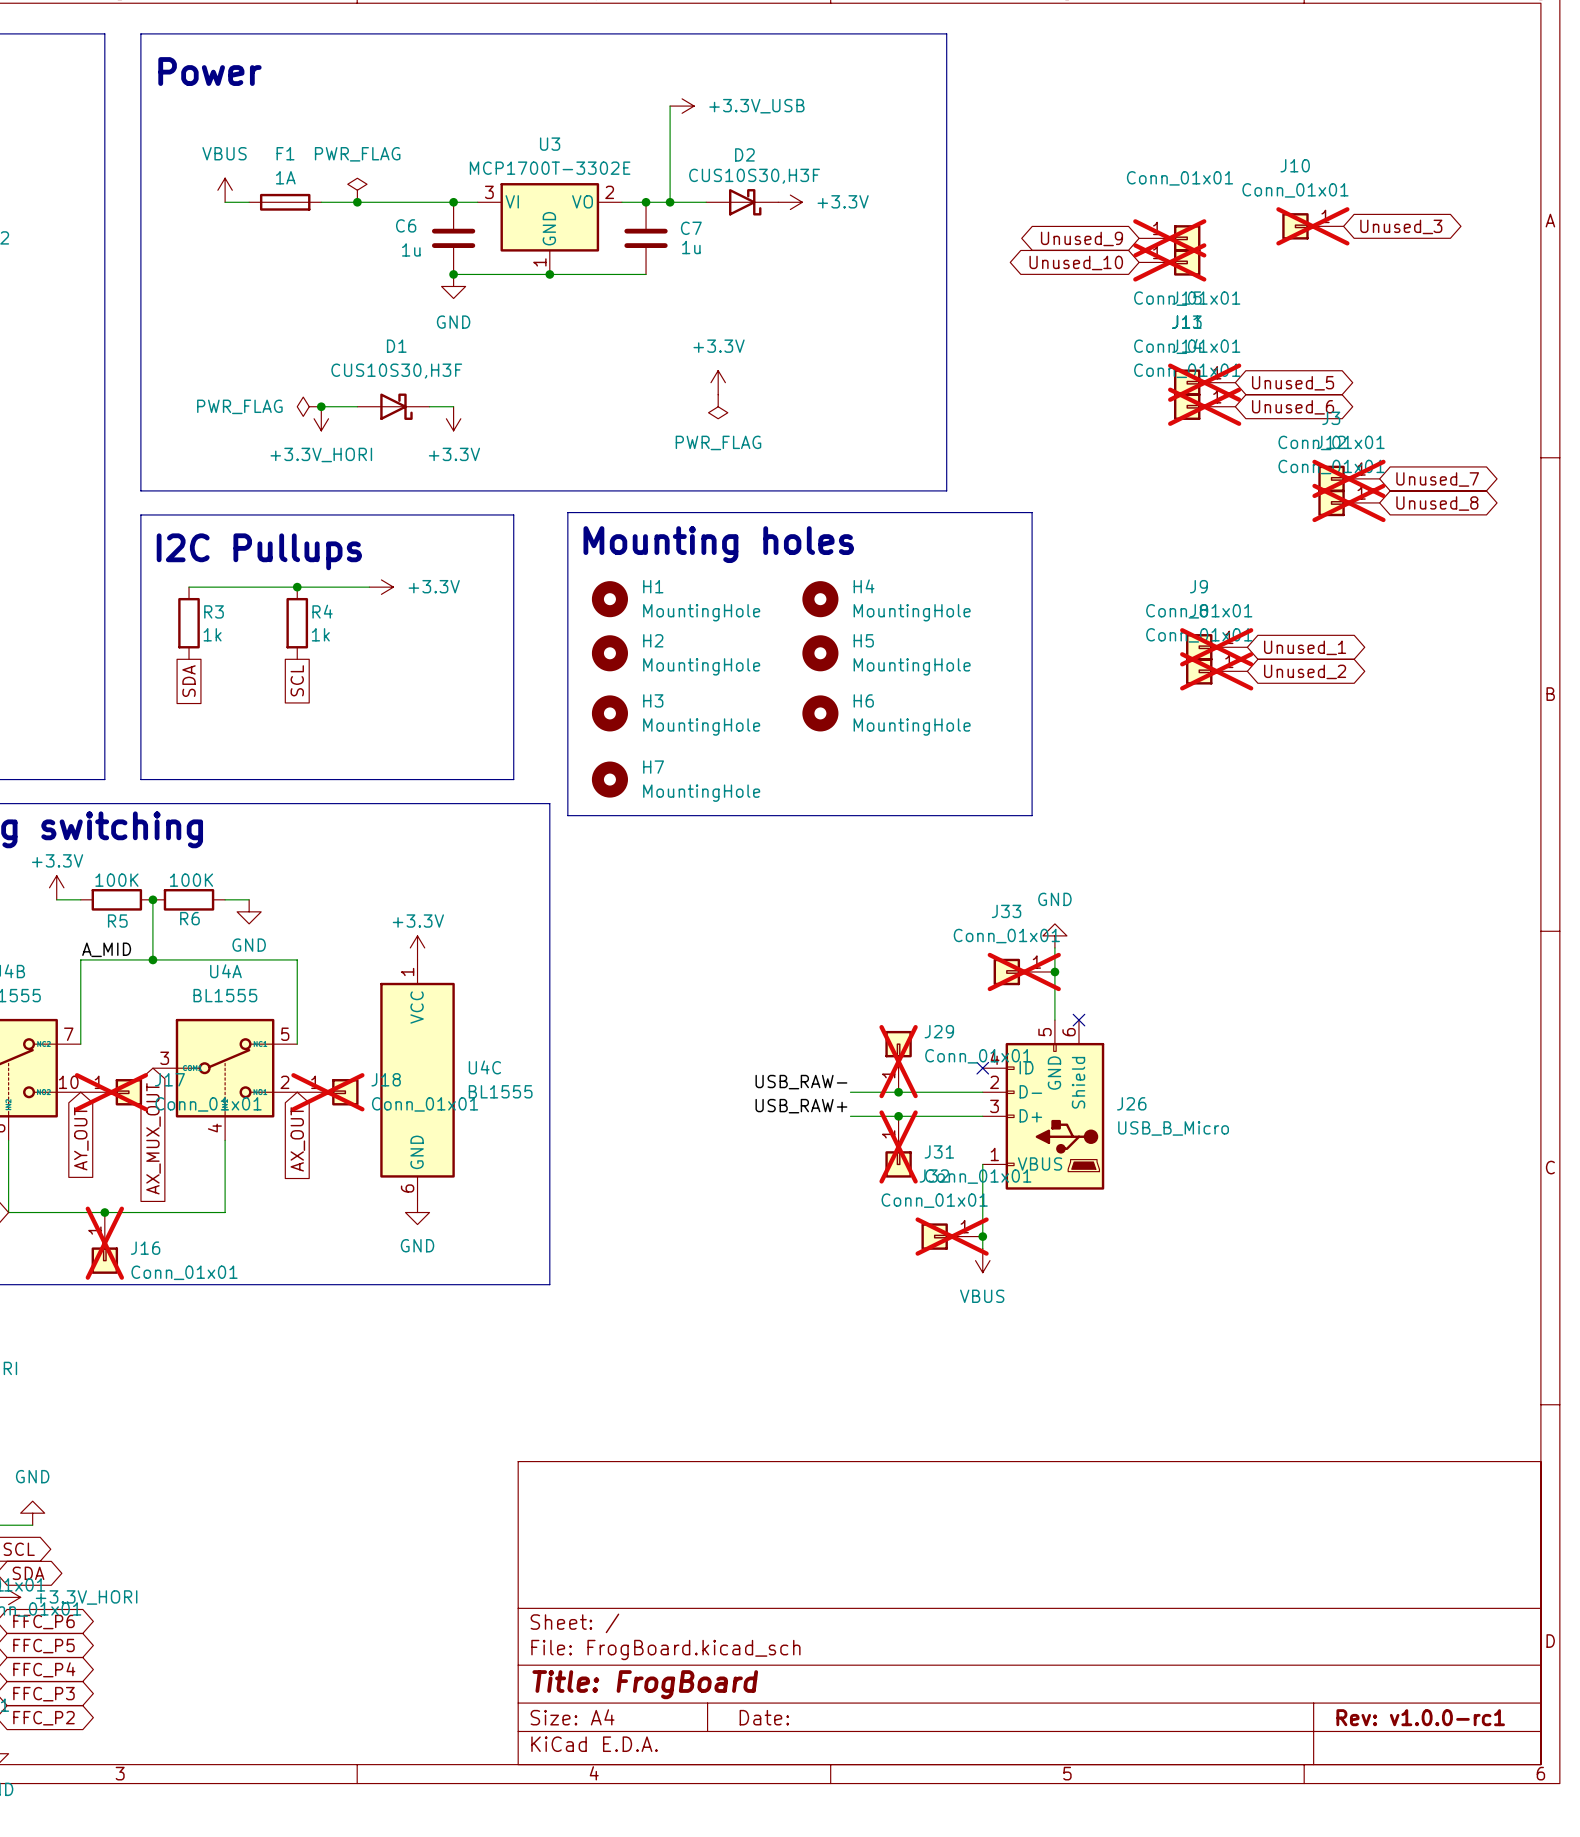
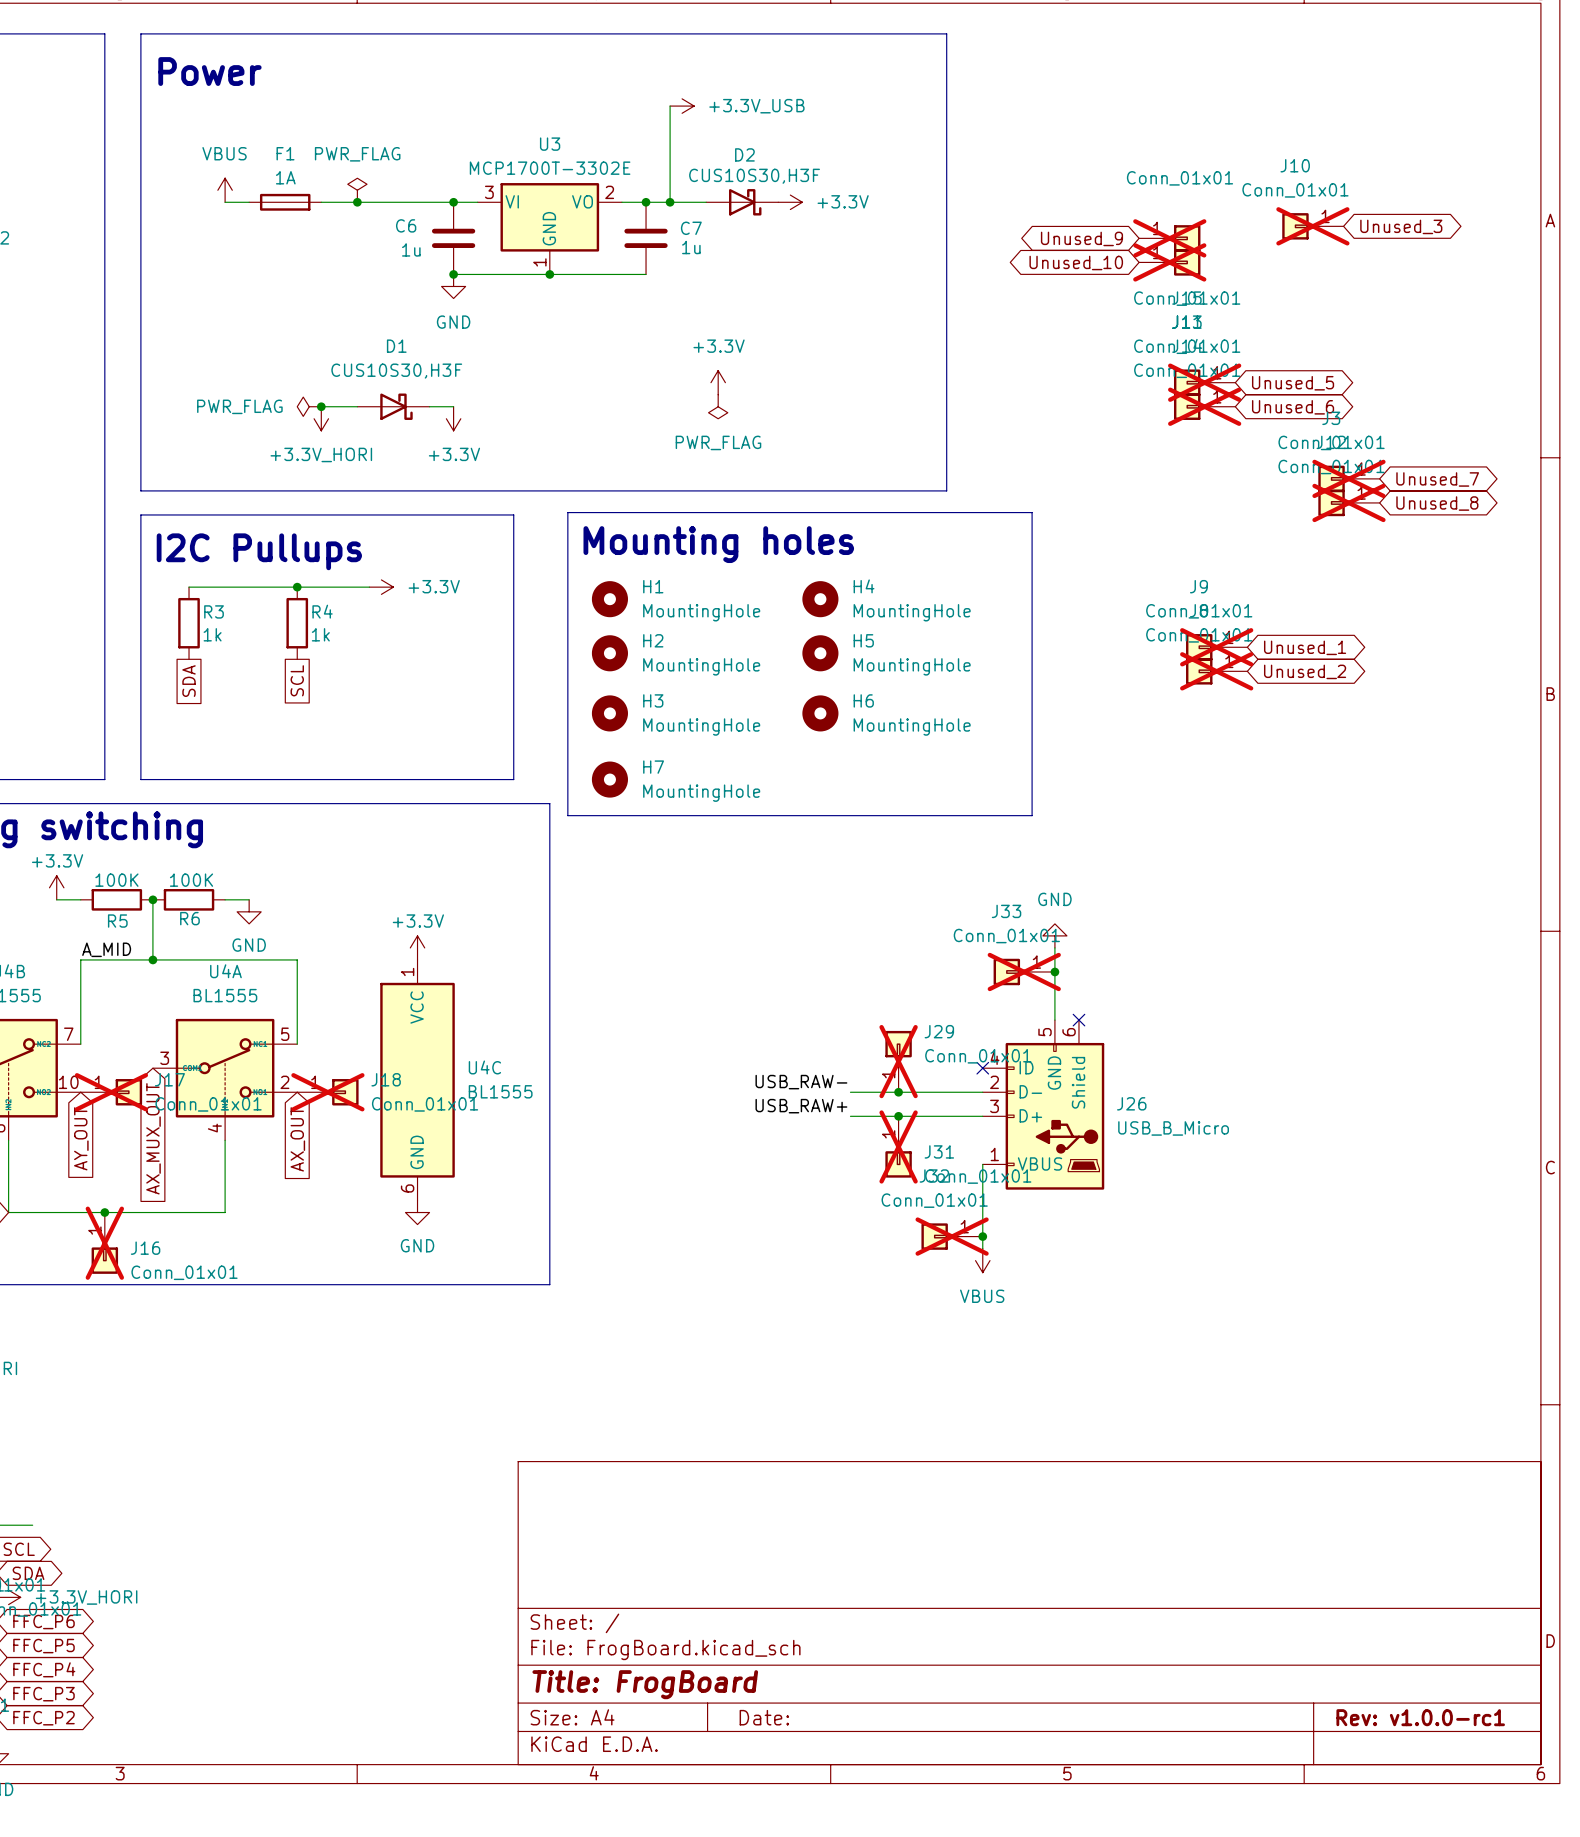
power symbol: GND (32, 1513) -> none

